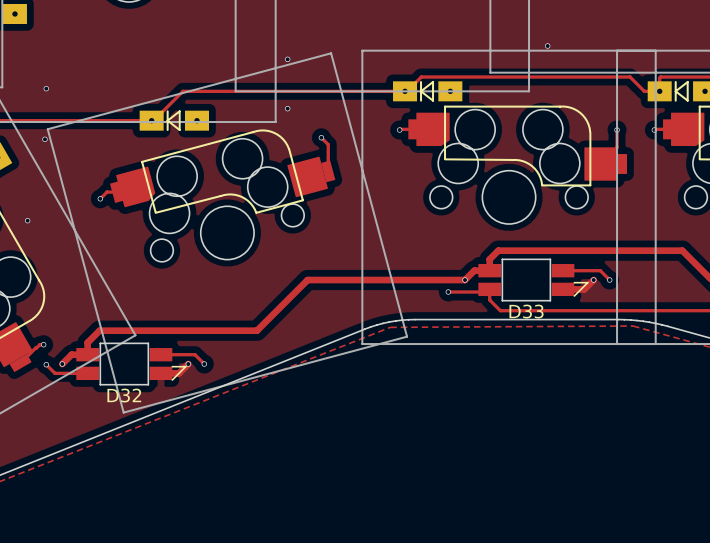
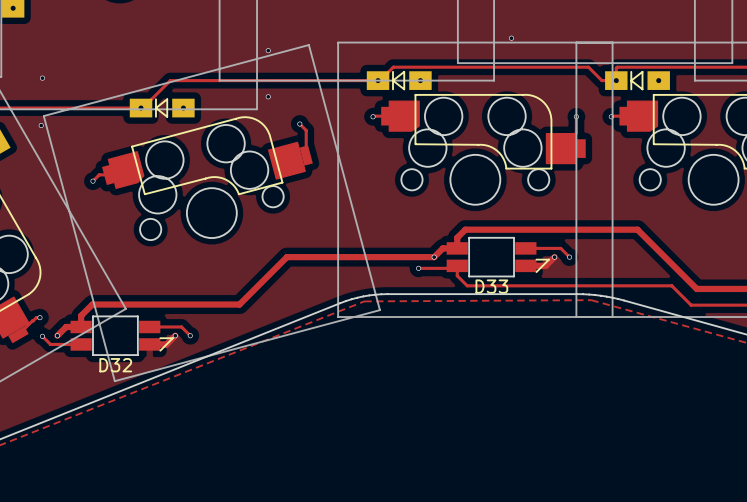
via: (27, 220) -> none

